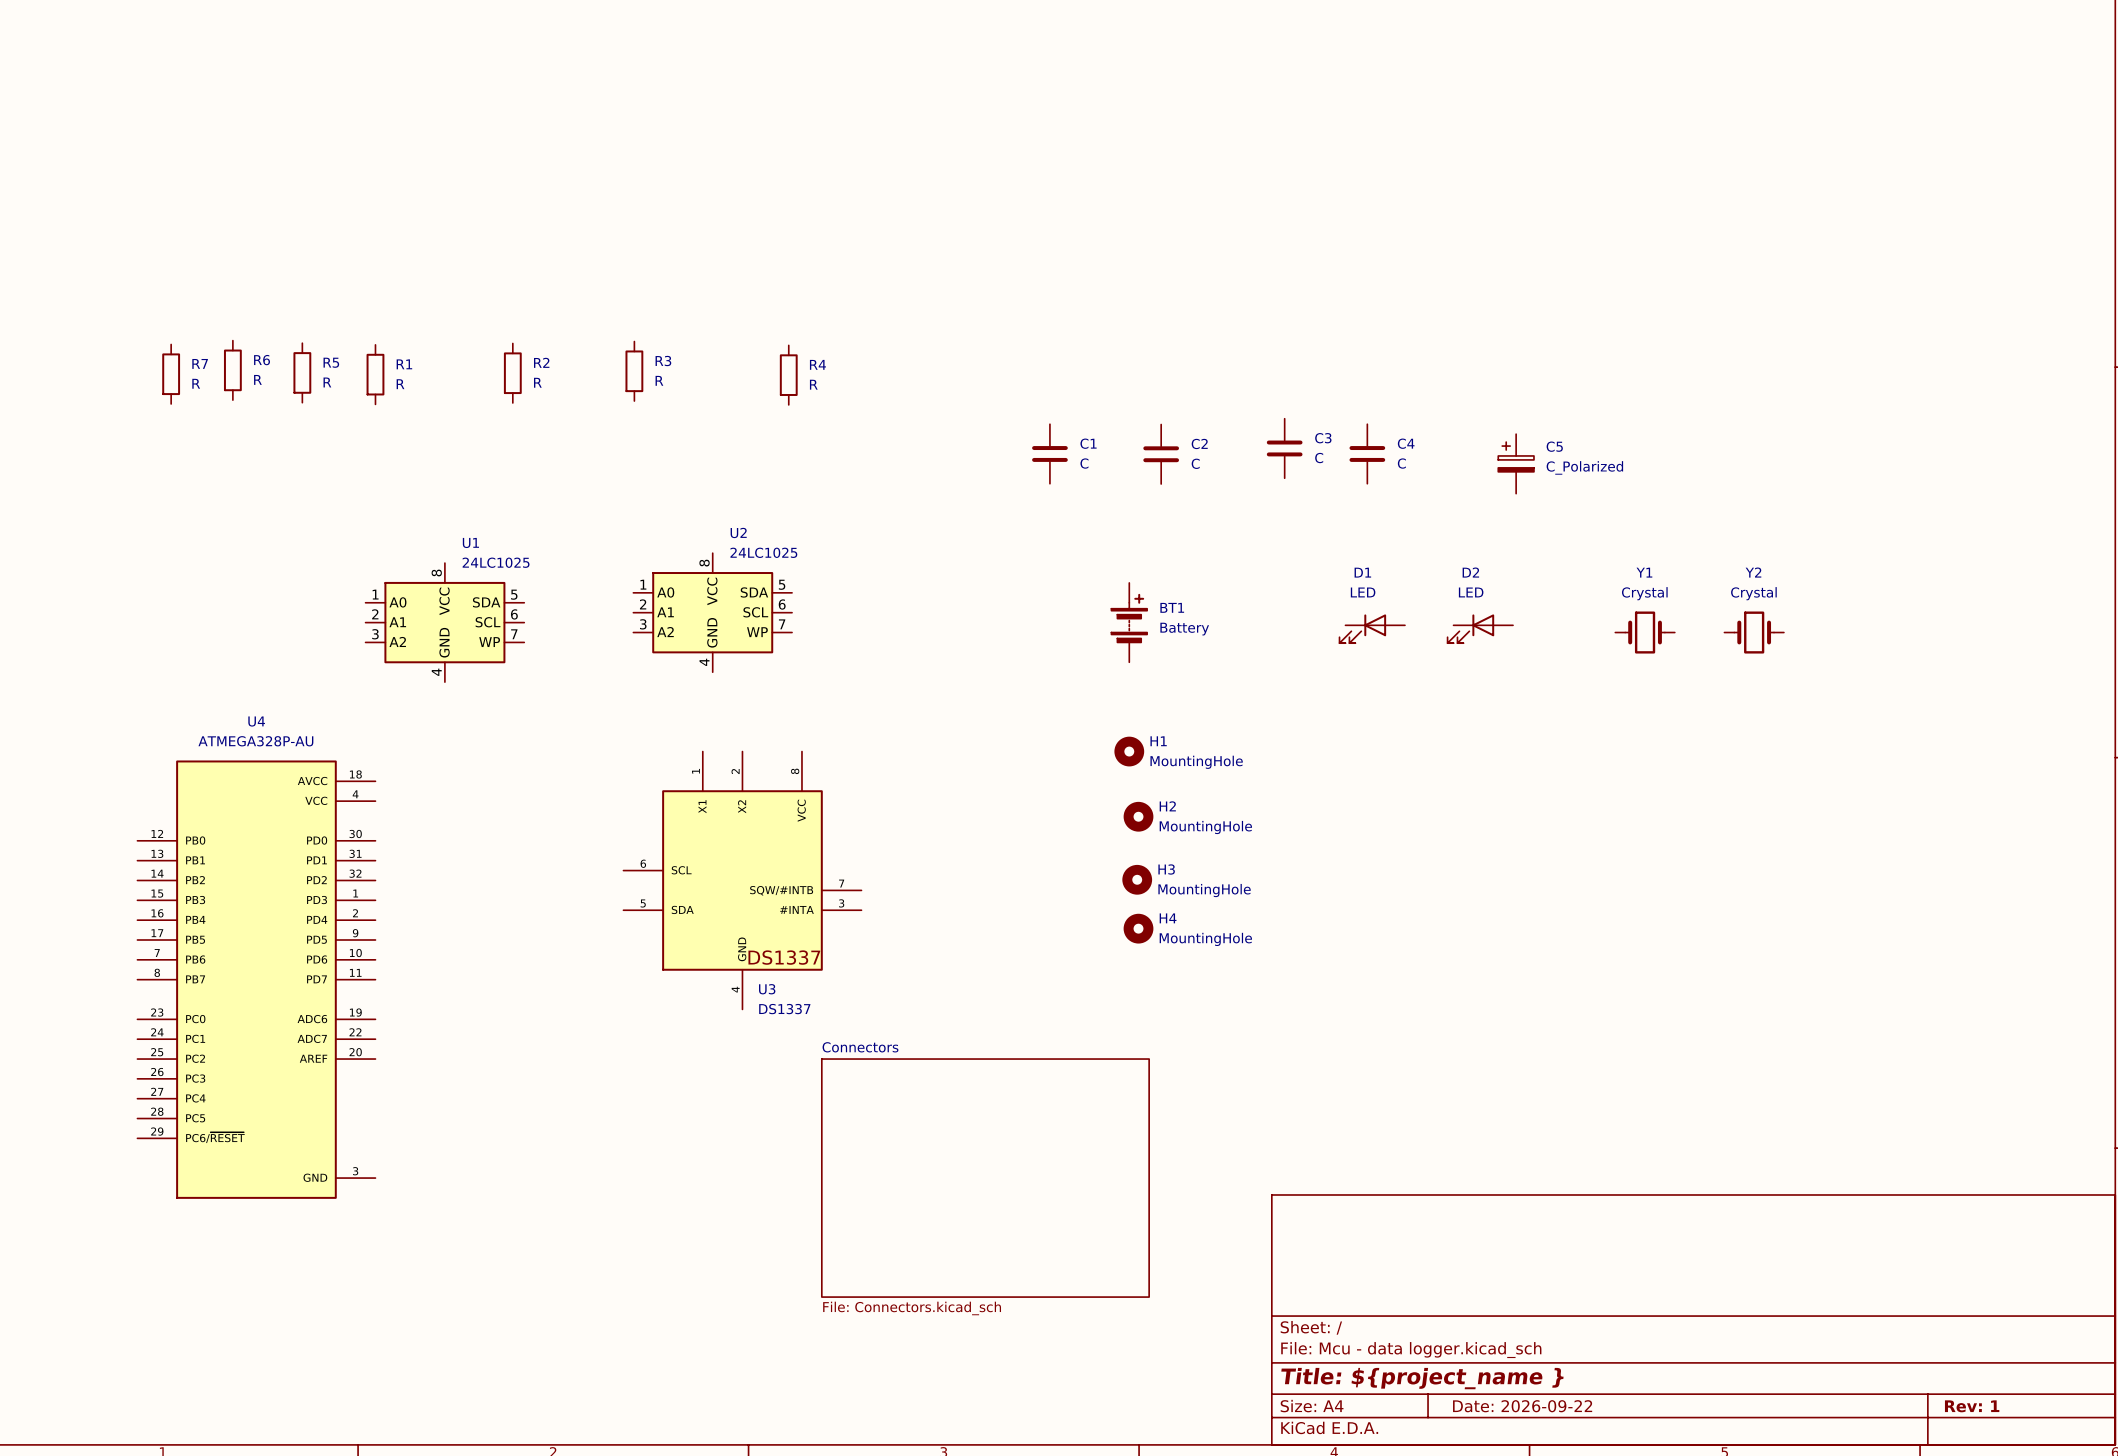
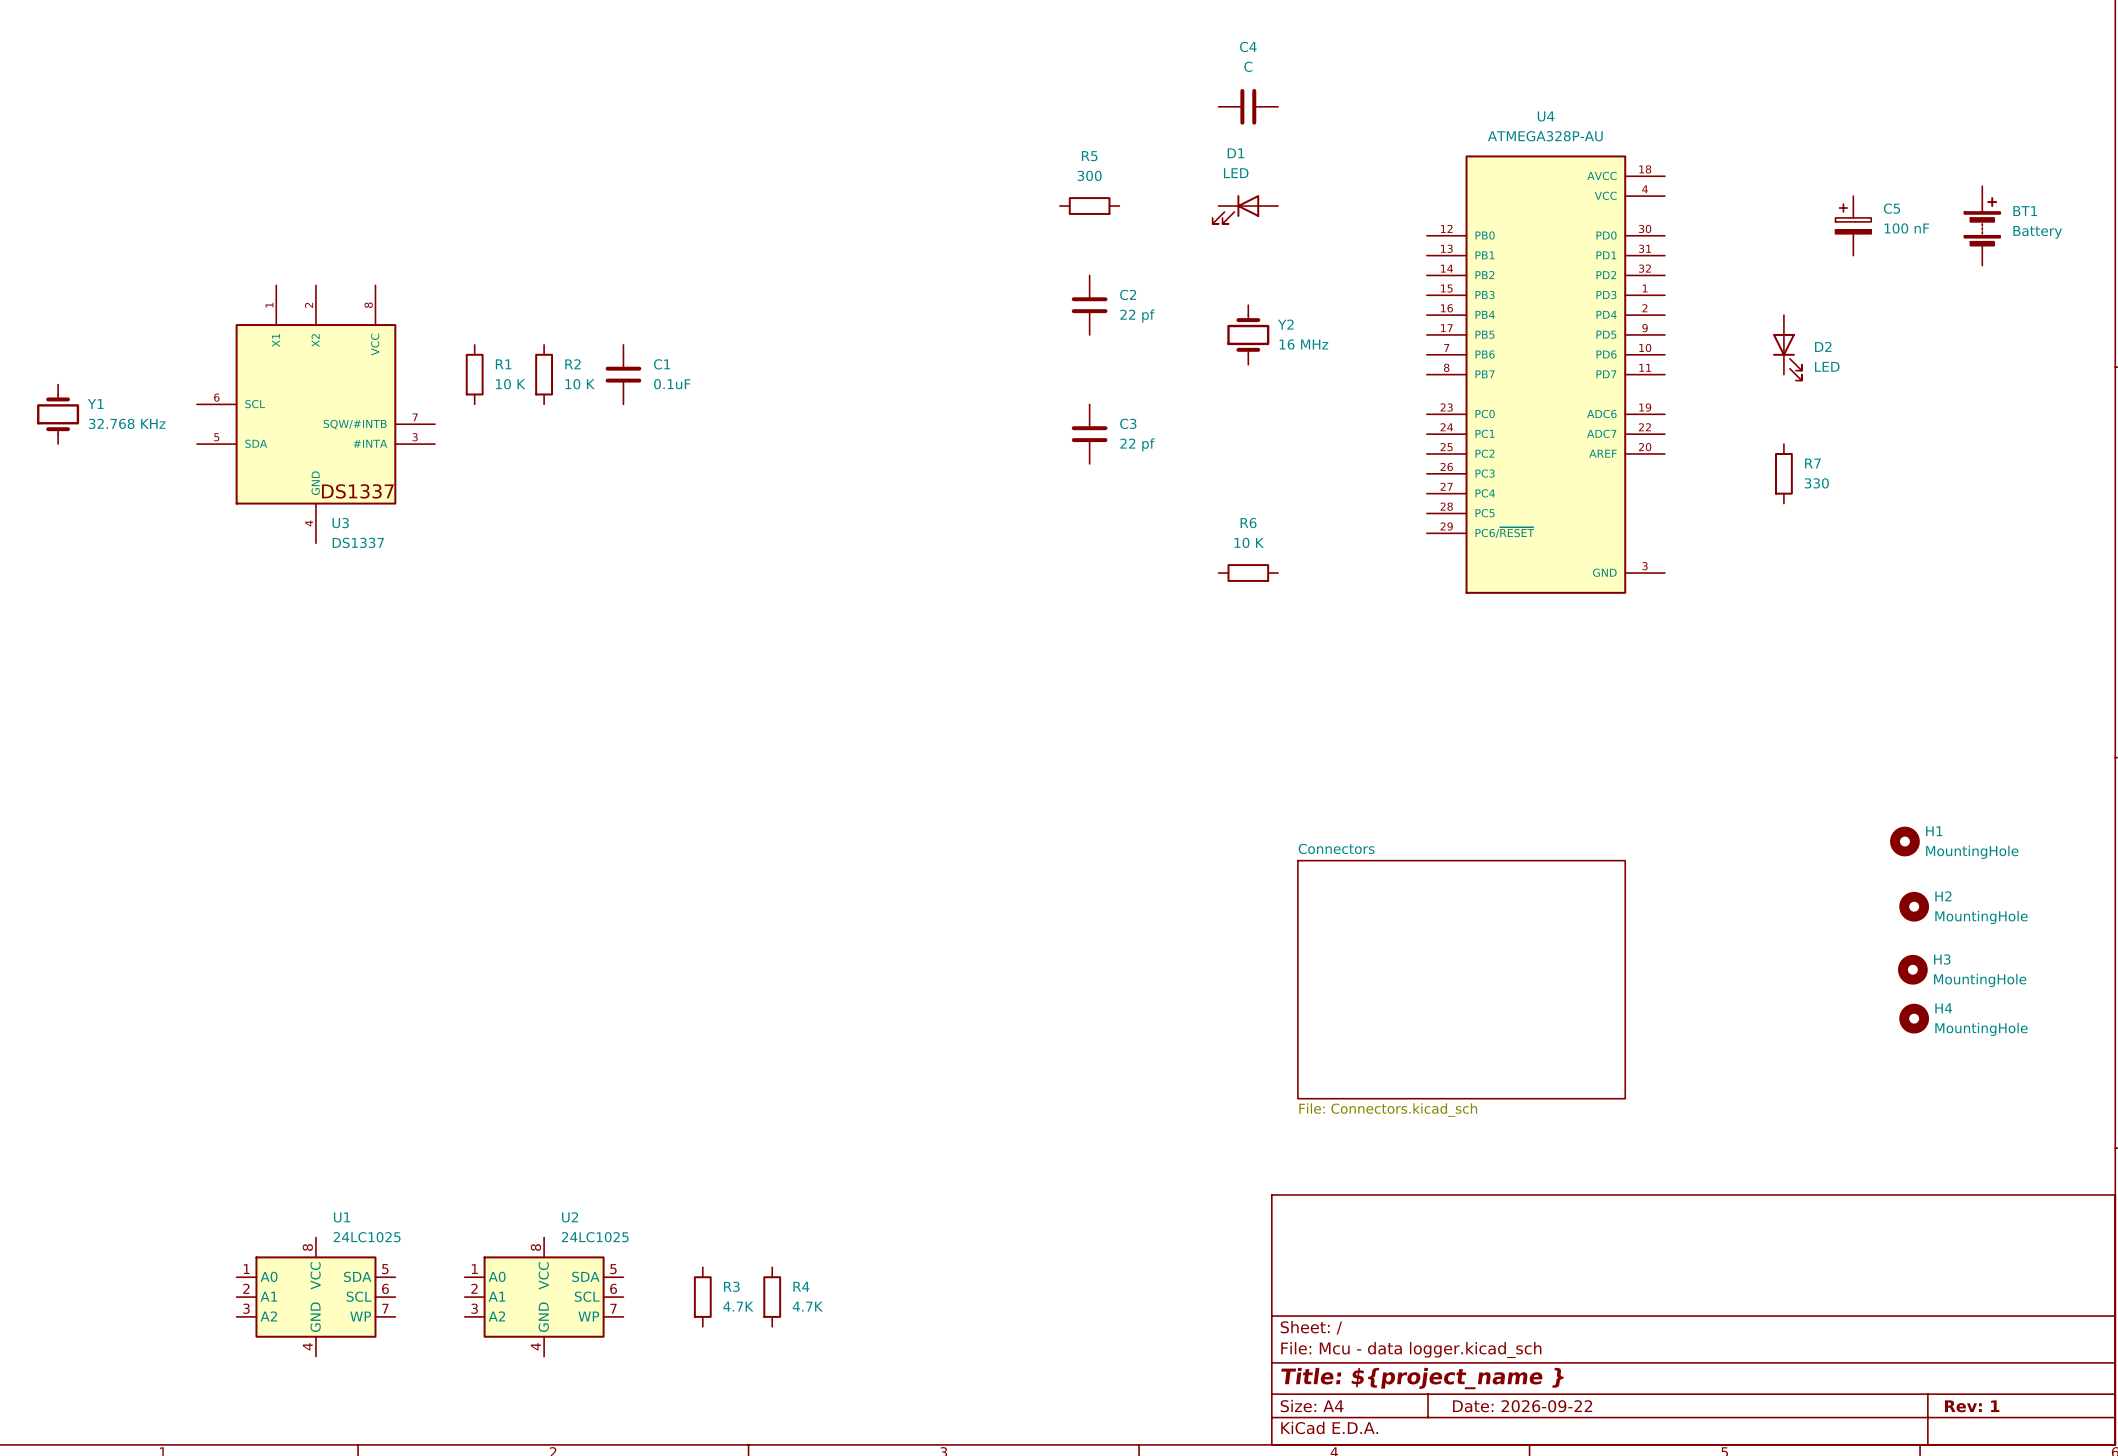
R6 name position: R6 (262, 360) -> R6 (1248, 523)
R5 name position: R5 (331, 362) -> R5 (1089, 156)
R6 rotation: 0° (232, 370) -> 90° clockwise (1248, 573)
R6 position: (232, 370) -> (1248, 573)
R3 position: (634, 371) -> (702, 1297)
R5 rotation: 0° (302, 372) -> 90° clockwise (1089, 206)
R5 position: (302, 372) -> (1089, 206)
R2 position: (512, 373) -> (544, 374)
R7 position: (171, 374) -> (1783, 473)
R1 position: (375, 374) -> (474, 374)
R4 position: (788, 375) -> (772, 1297)
R6 value: R (257, 379) -> 10 K (1249, 542)
R3 value: R (659, 380) -> 4.7K (738, 1306)
R5 value: R (327, 382) -> 300 (1089, 175)
R2 value: R (537, 382) -> 10 K (580, 384)
R7 value: R (196, 383) -> 330 (1816, 483)
R1 value: R (400, 384) -> 10 K (510, 384)
R4 value: R (813, 384) -> 4.7K (807, 1306)
C4 name position: C4 (1406, 443) -> C4 (1248, 46)
C3 position: (1284, 448) -> (1089, 434)
C1 position: (1049, 453) -> (623, 374)
C4 rotation: 0° (1367, 453) -> 90° clockwise (1248, 106)
C4 position: (1367, 453) -> (1248, 106)
C2 position: (1161, 454) -> (1089, 305)
C3 value: C (1319, 458) -> 22 pf (1137, 444)
C1 value: C (1084, 463) -> 0.1uF (672, 384)
C2 value: C (1195, 463) -> 22 pf (1137, 315)
C4 value position: C (1401, 463) -> C (1248, 66)
C5 position: (1516, 463) -> (1853, 225)
C5 value: C_Polarized (1584, 467) -> 100 nF (1906, 228)
D2 name position: D2 (1470, 572) -> D2 (1823, 346)
Y1 name position: Y1 (1644, 572) -> Y1 (95, 404)
Y2 name position: Y2 (1753, 572) -> Y2 (1285, 324)
D2 value position: LED (1471, 592) -> LED (1827, 366)
Y1 value: Crystal (1644, 593) -> 32.768 KHz (127, 423)
Y2 value: Crystal (1753, 593) -> 16 MHz (1303, 344)
U2 position: (712, 612) -> (544, 1297)
U1 position: (444, 622) -> (315, 1297)
BT1 position: (1129, 622) -> (1982, 225)
D1 position: (1372, 628) -> (1245, 209)
D2 rotation: 0° (1470, 628) -> 90° counterclockwise (1787, 357)
D2 position: (1480, 628) -> (1787, 347)
Y1 rotation: 0° (1645, 632) -> 90° clockwise (58, 414)
Y1 position: (1645, 632) -> (58, 414)
Y2 rotation: 0° (1754, 632) -> 90° clockwise (1248, 334)
Y2 position: (1754, 632) -> (1248, 334)
H1 position: (1129, 751) -> (1904, 841)
H2 position: (1138, 816) -> (1914, 906)
H3 position: (1137, 879) -> (1912, 969)
U3 position: (742, 880) -> (315, 414)
H4 position: (1138, 928) -> (1914, 1018)
U4 position: (256, 979) -> (1545, 374)
sheet Connectors: none -> File: Connectors.kicad_sch (1461, 979)
sheet Connectors: File: Connectors.kicad_sch (985, 1178) -> none

